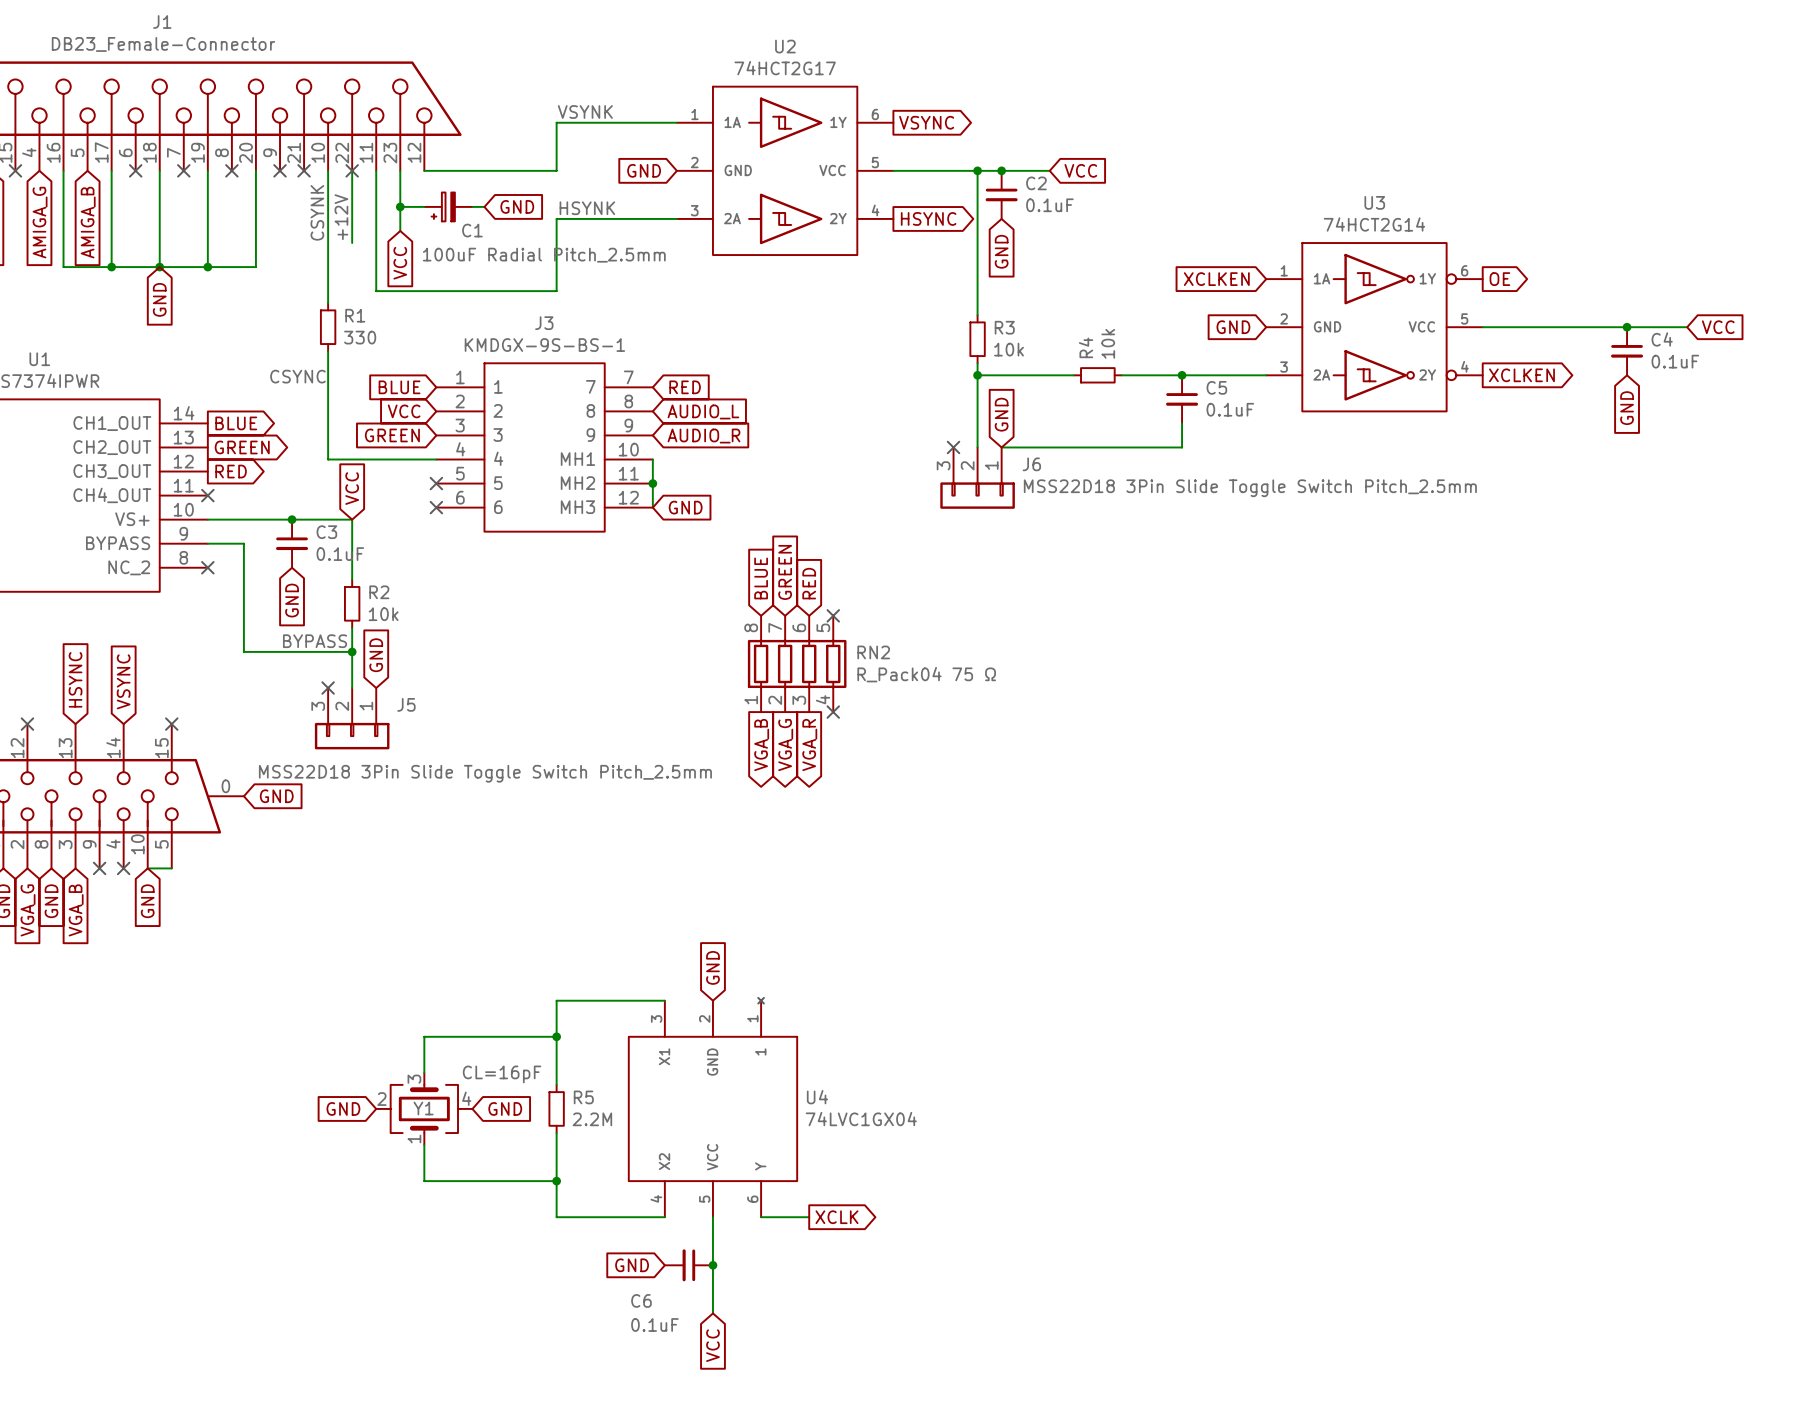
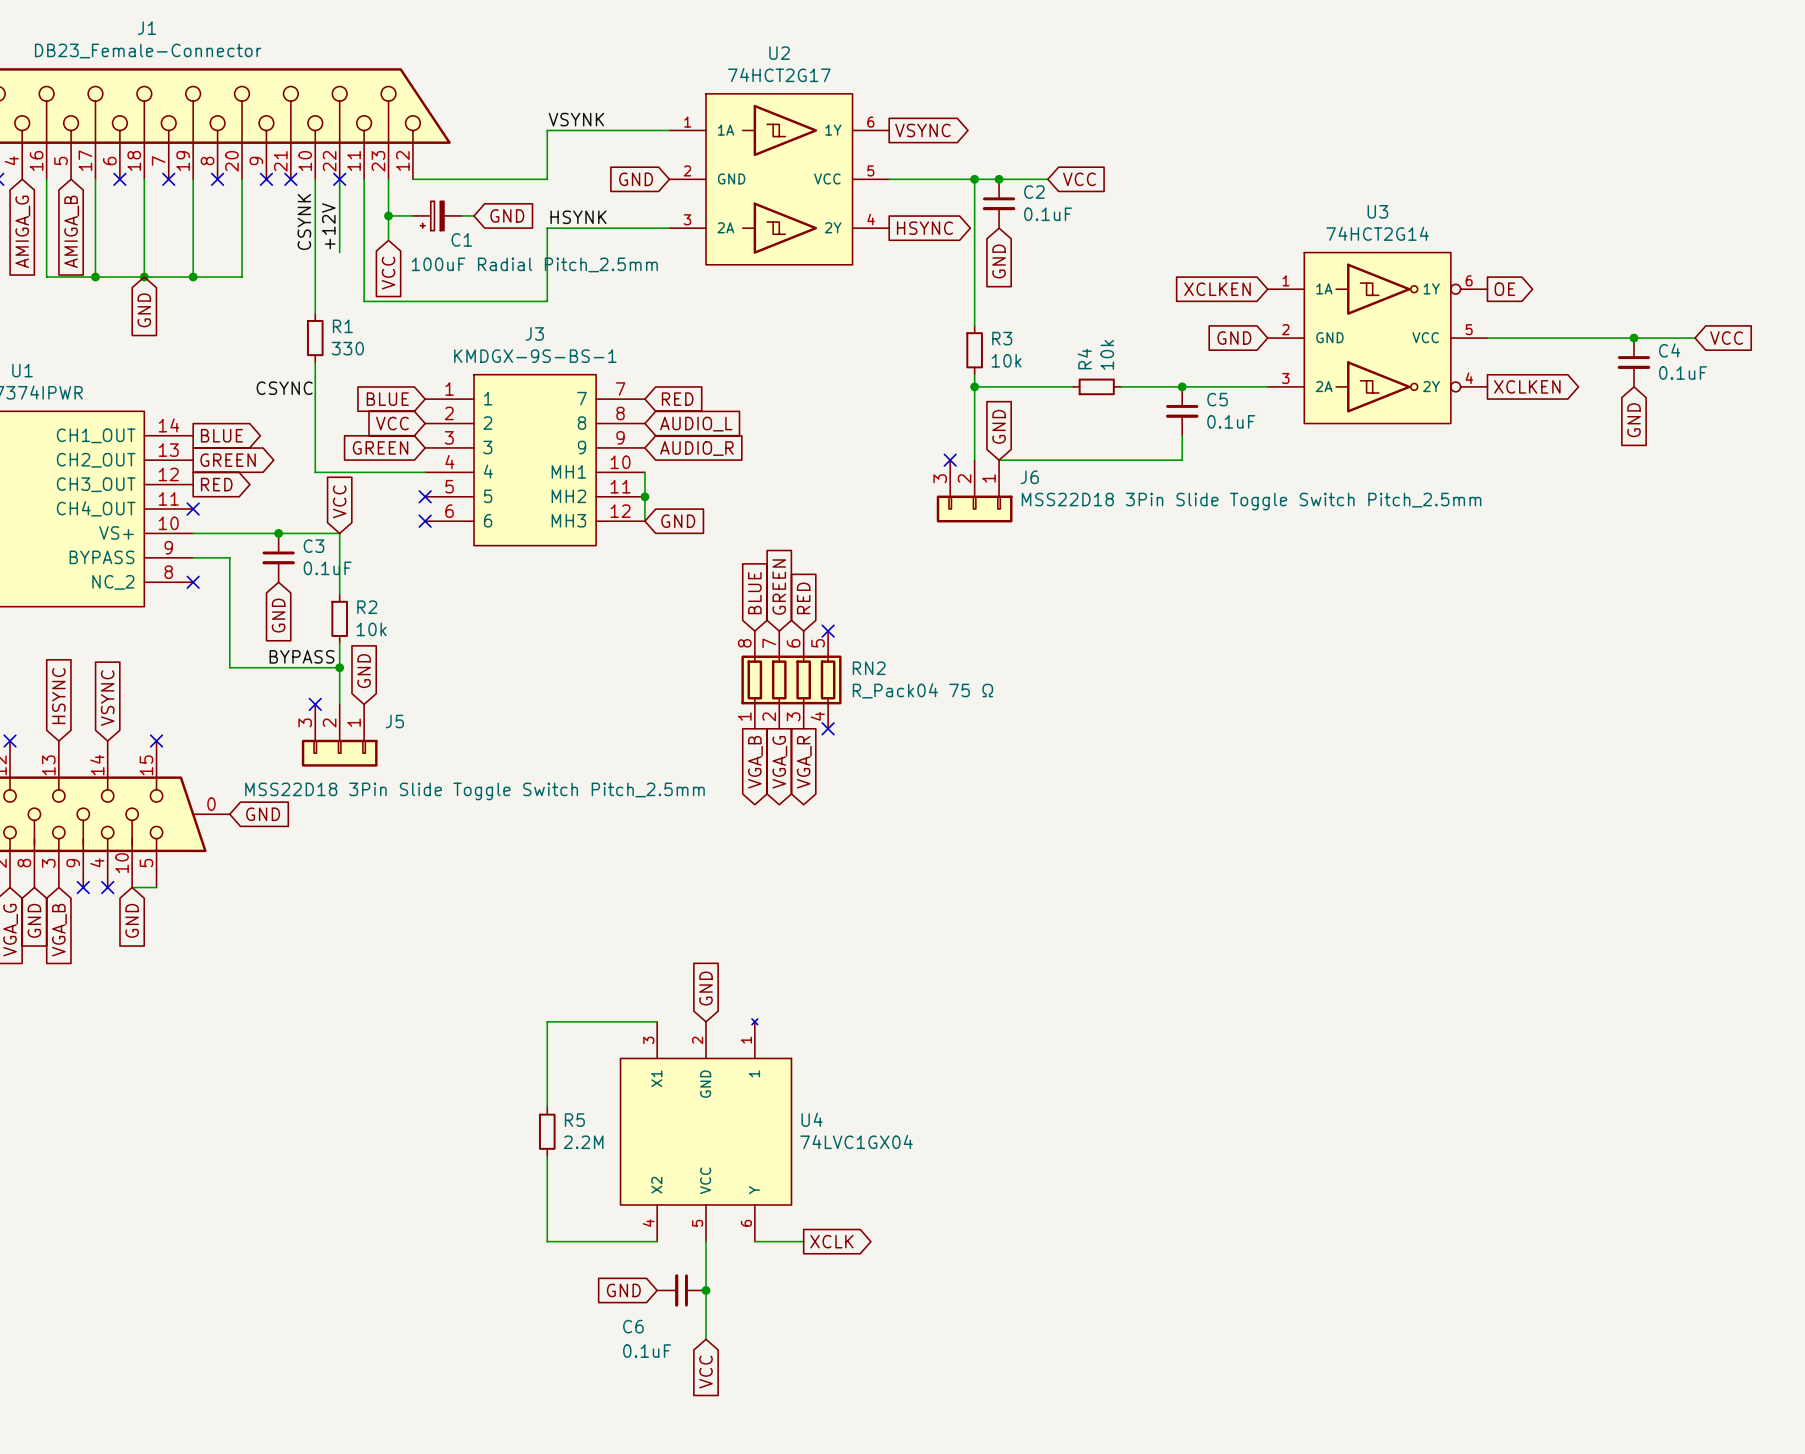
wire: (556, 1036) (424, 1036) (424, 1072) -> none
junction: (556, 1036) -> none
global label: GND (343, 1108) -> none
Y1: CL=16pF (424, 1108) -> none
global label: GND (505, 1108) -> none
wire: (424, 1145) (424, 1181) (556, 1181) -> none
junction: (556, 1181) -> none

